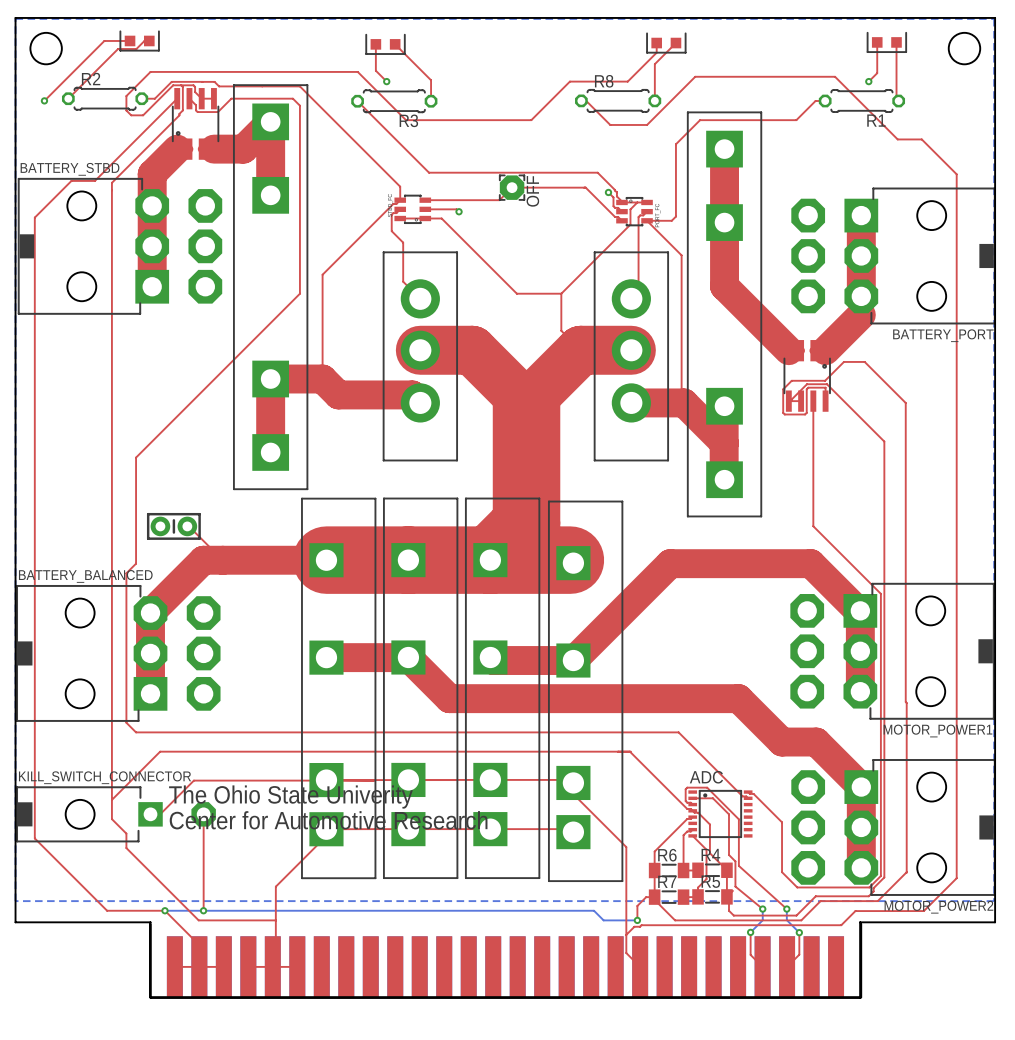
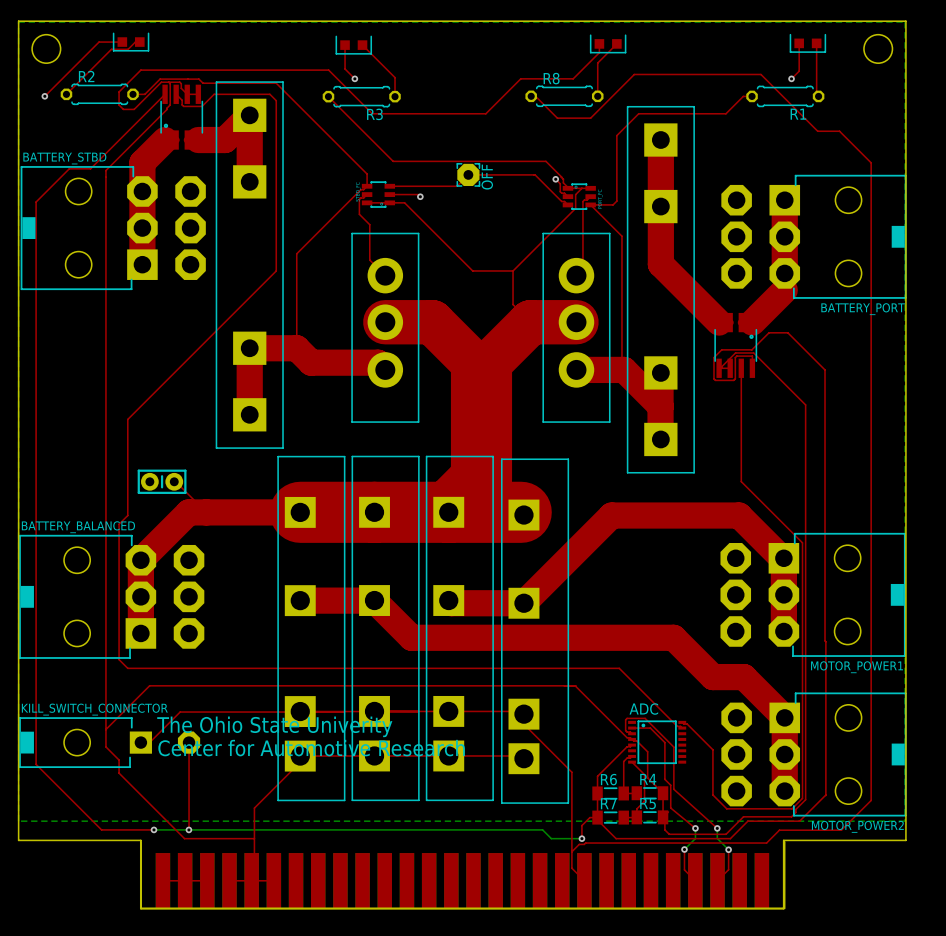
top track: (164, 910) (199, 945) (199, 966) -> none

